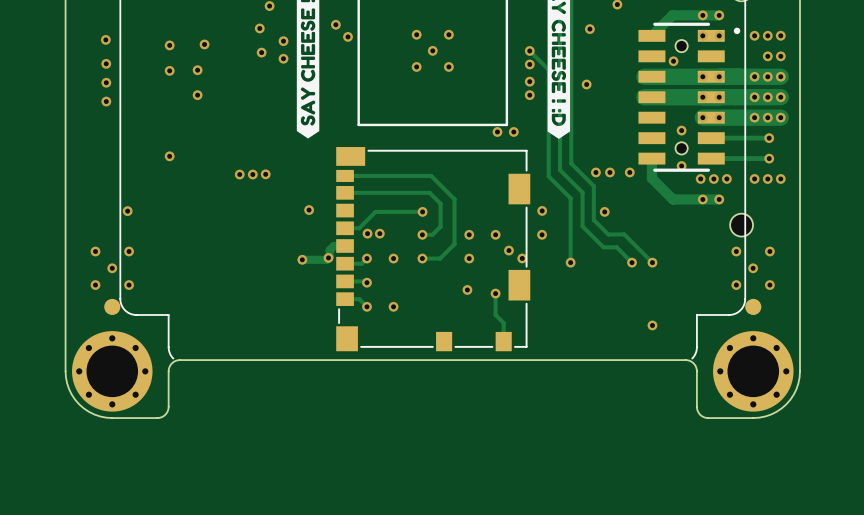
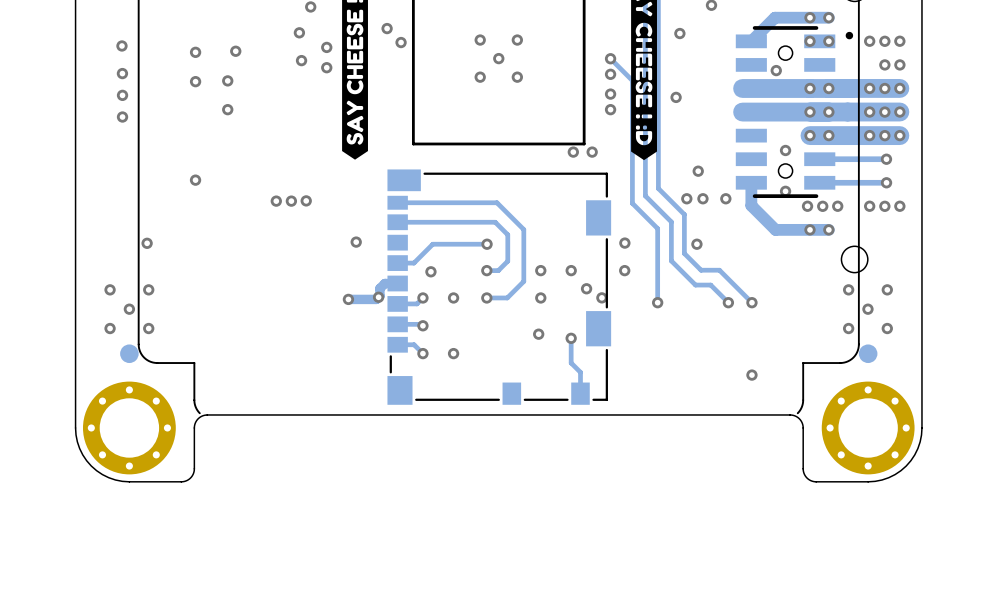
via: none -> (698, 171)
via: (367, 233) -> none
via: (379, 233) -> none
via: none -> (430, 271)

